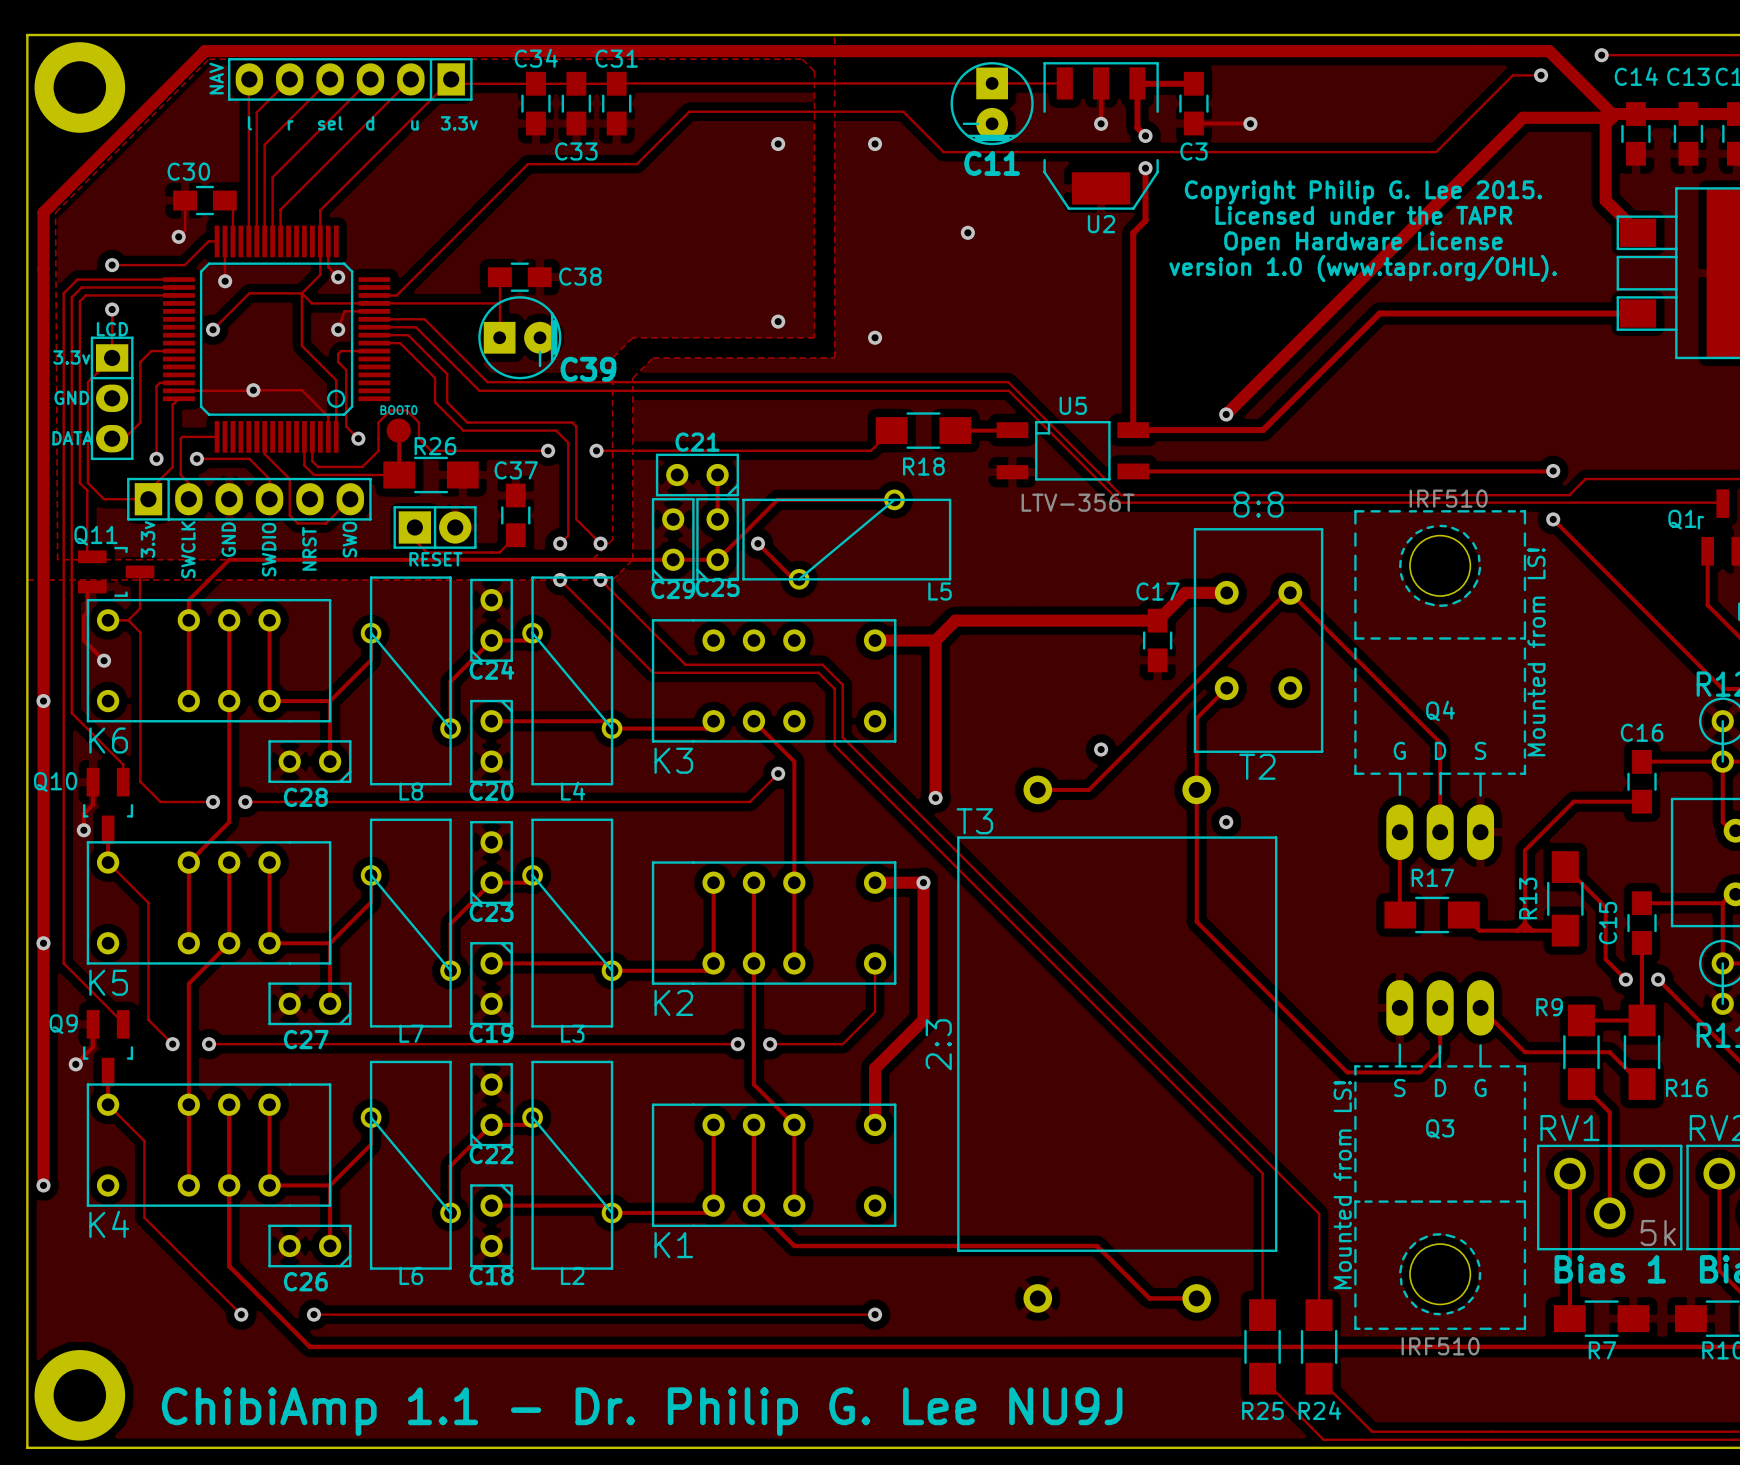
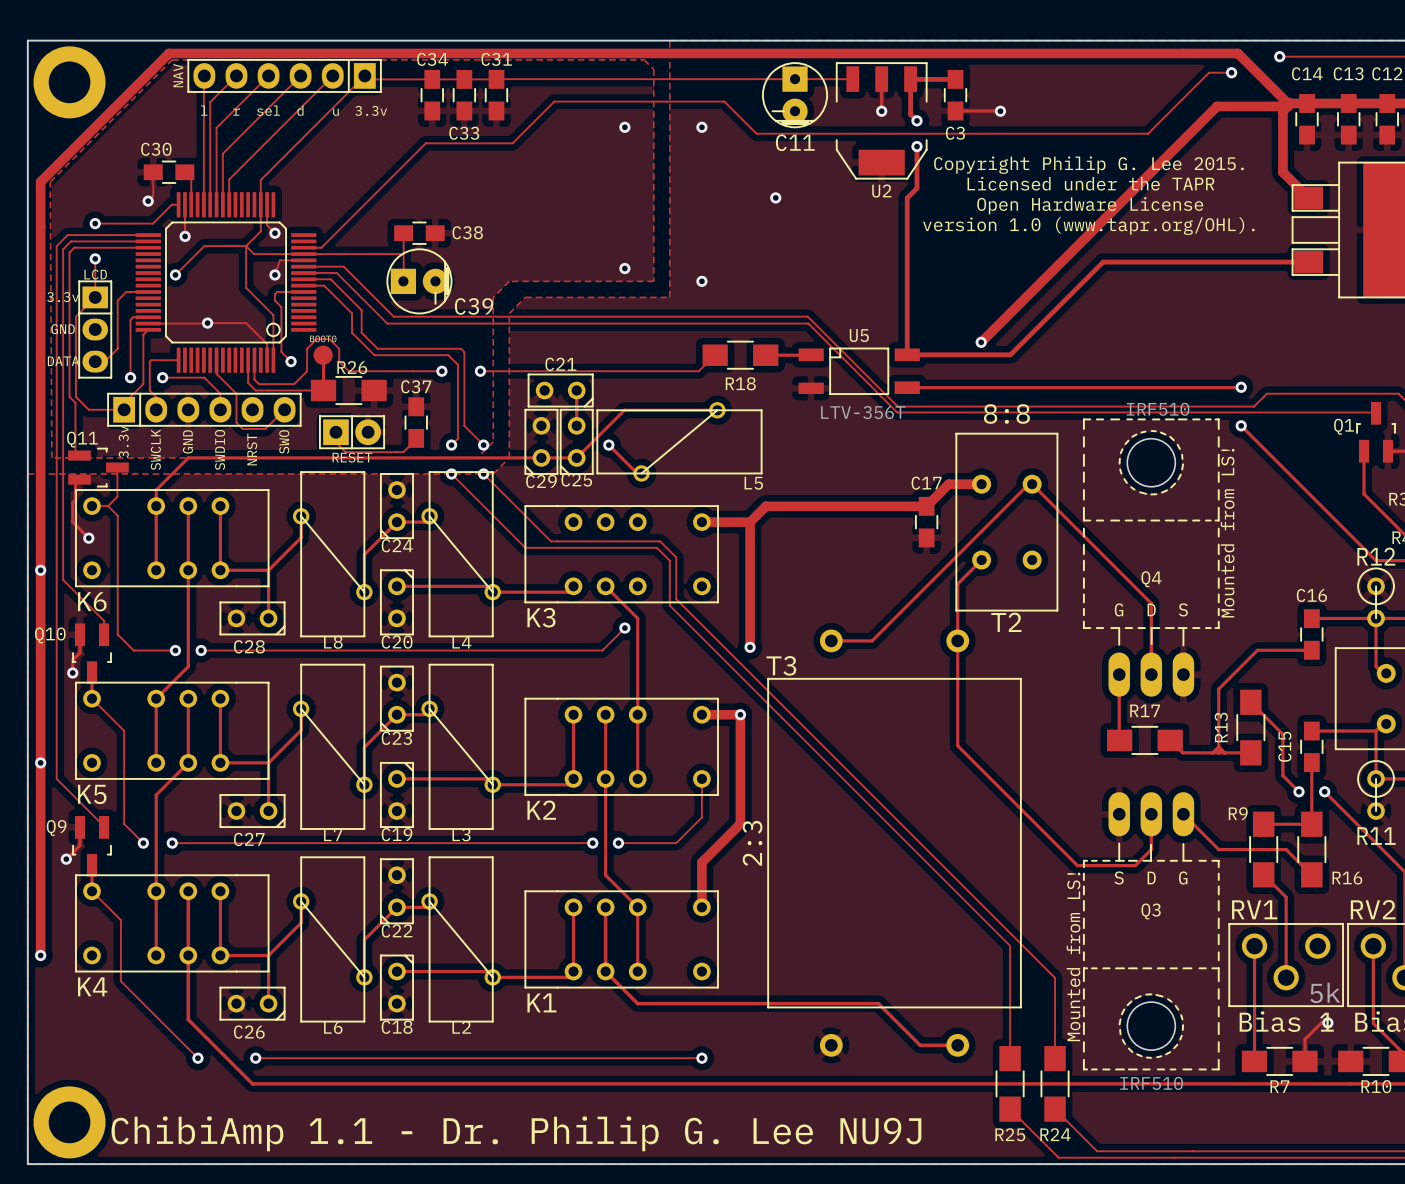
via: (1101, 749) -> none
via: (1226, 822) -> none
track: none -> (1327, 1022) (1321, 1022) (1305, 1039) (1305, 1061)
via: none -> (1327, 1022)

